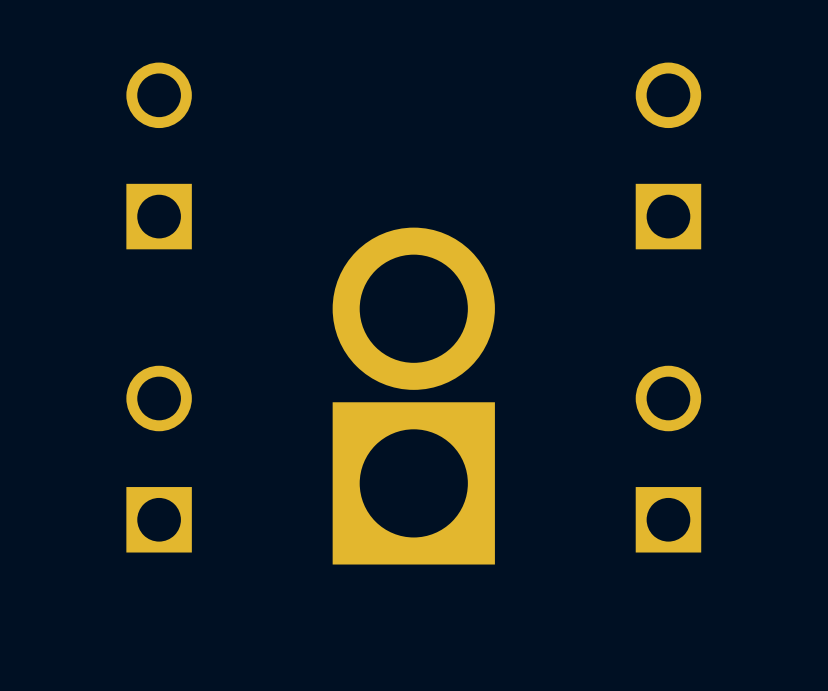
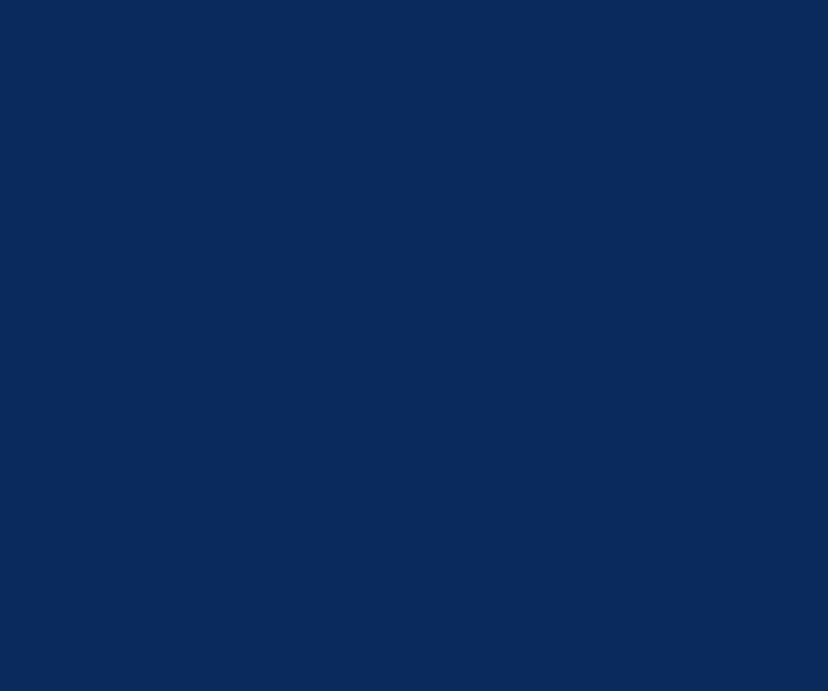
part: (159, 155) -> none
part: (668, 155) -> none
part: (413, 396) -> none
part: (159, 459) -> none
part: (668, 459) -> none

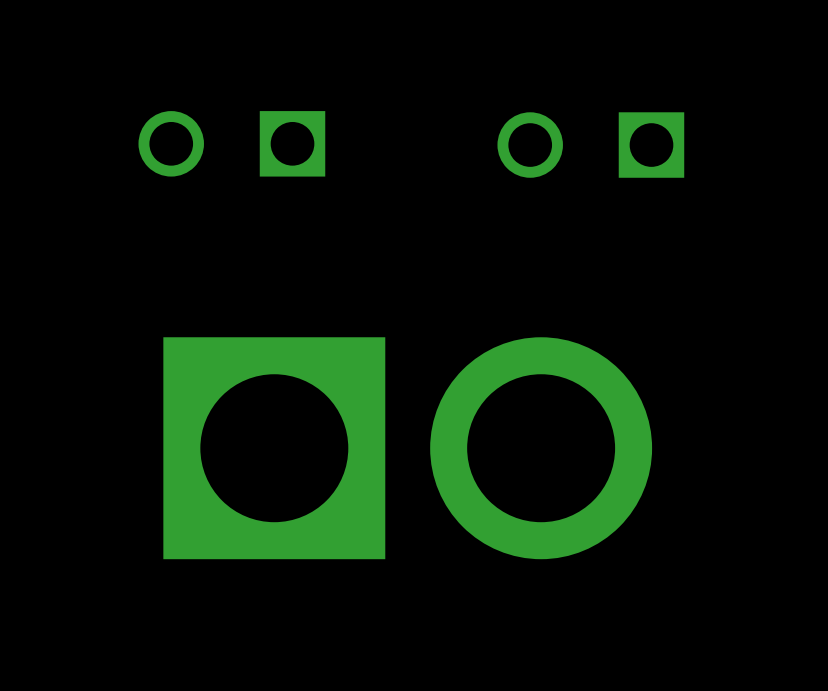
part: none -> (231, 143)
part: none -> (590, 145)
part: none -> (407, 448)

